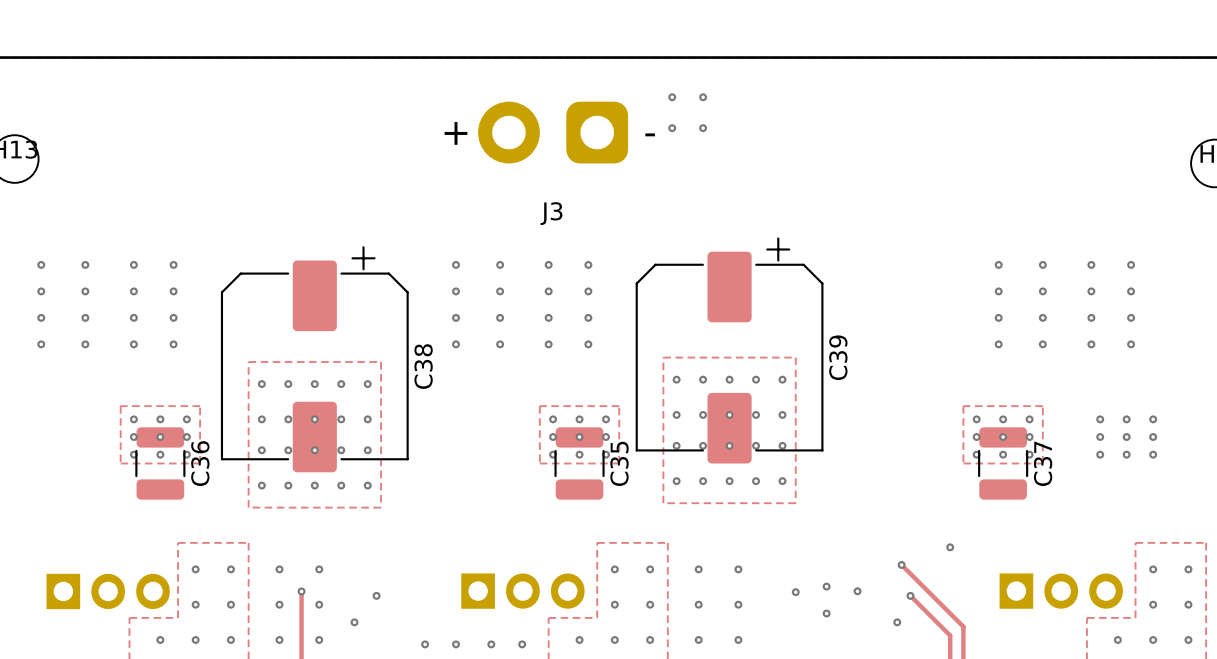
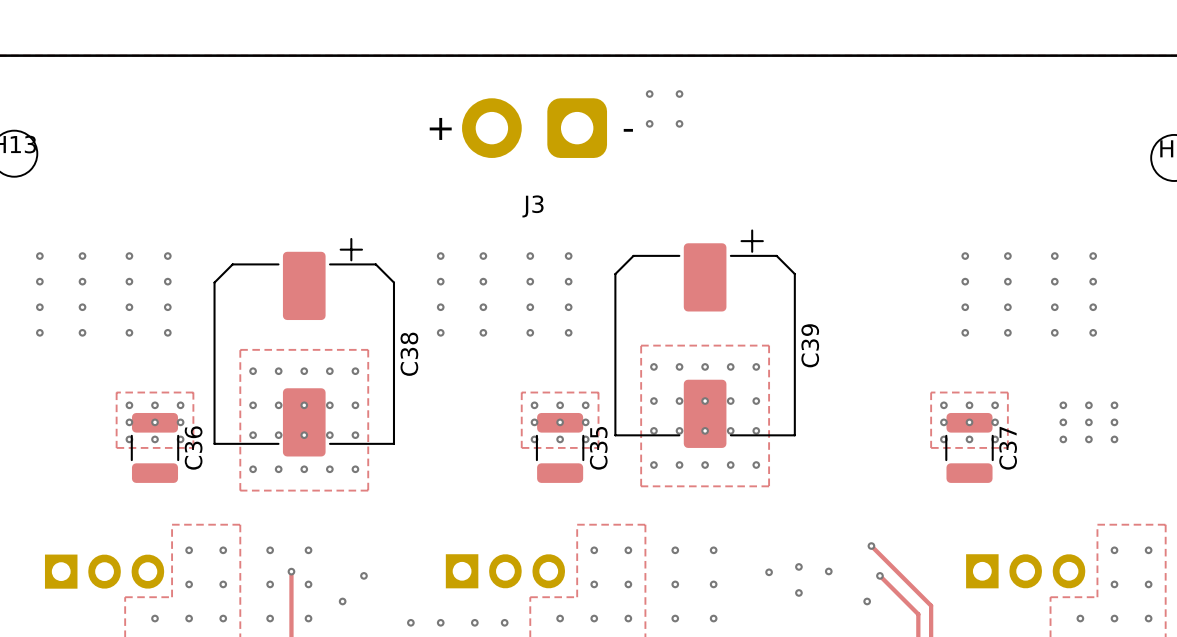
via: (950, 547) -> none

